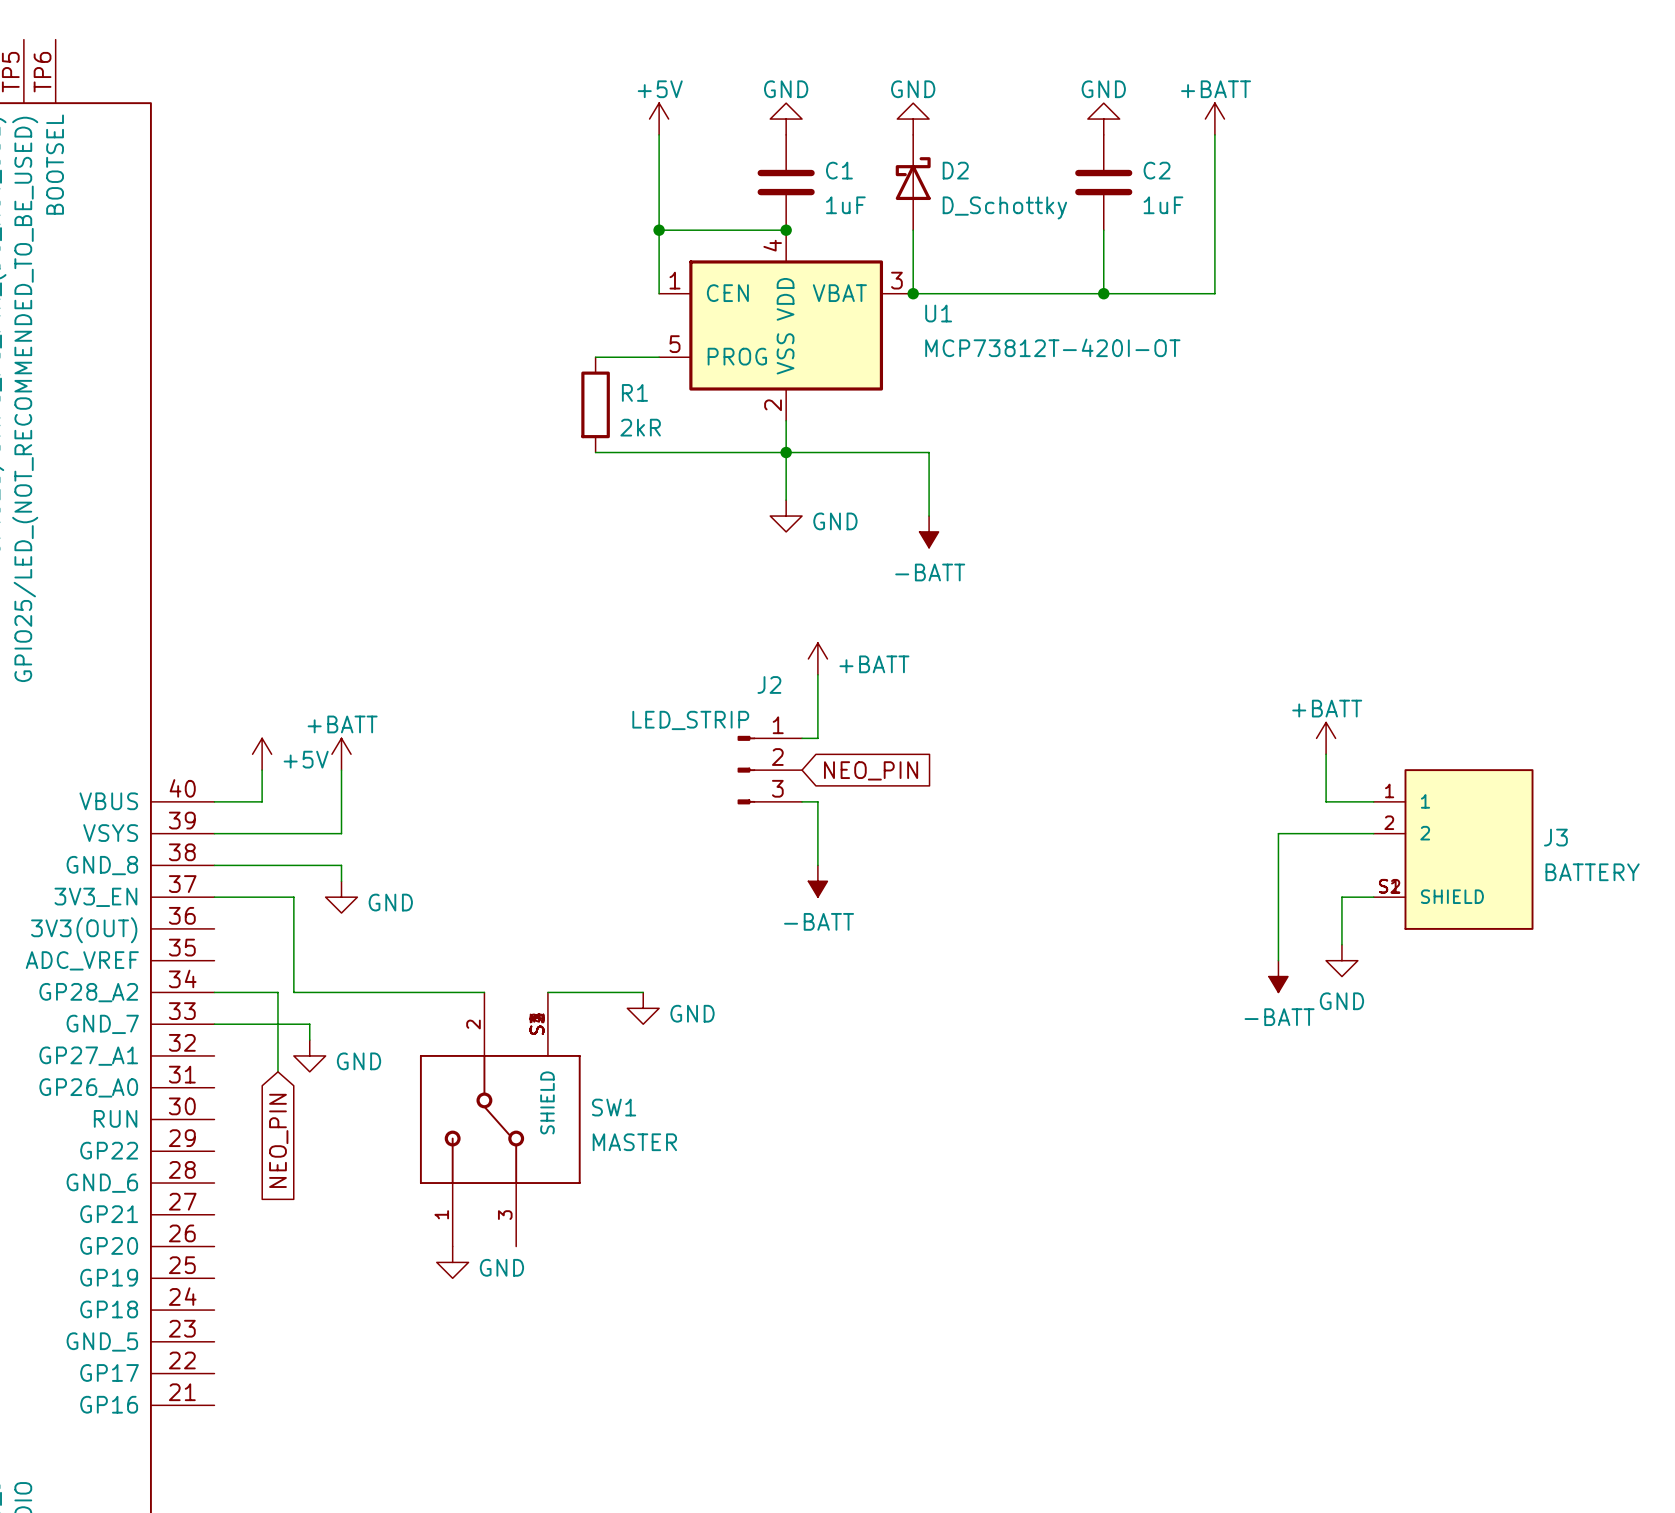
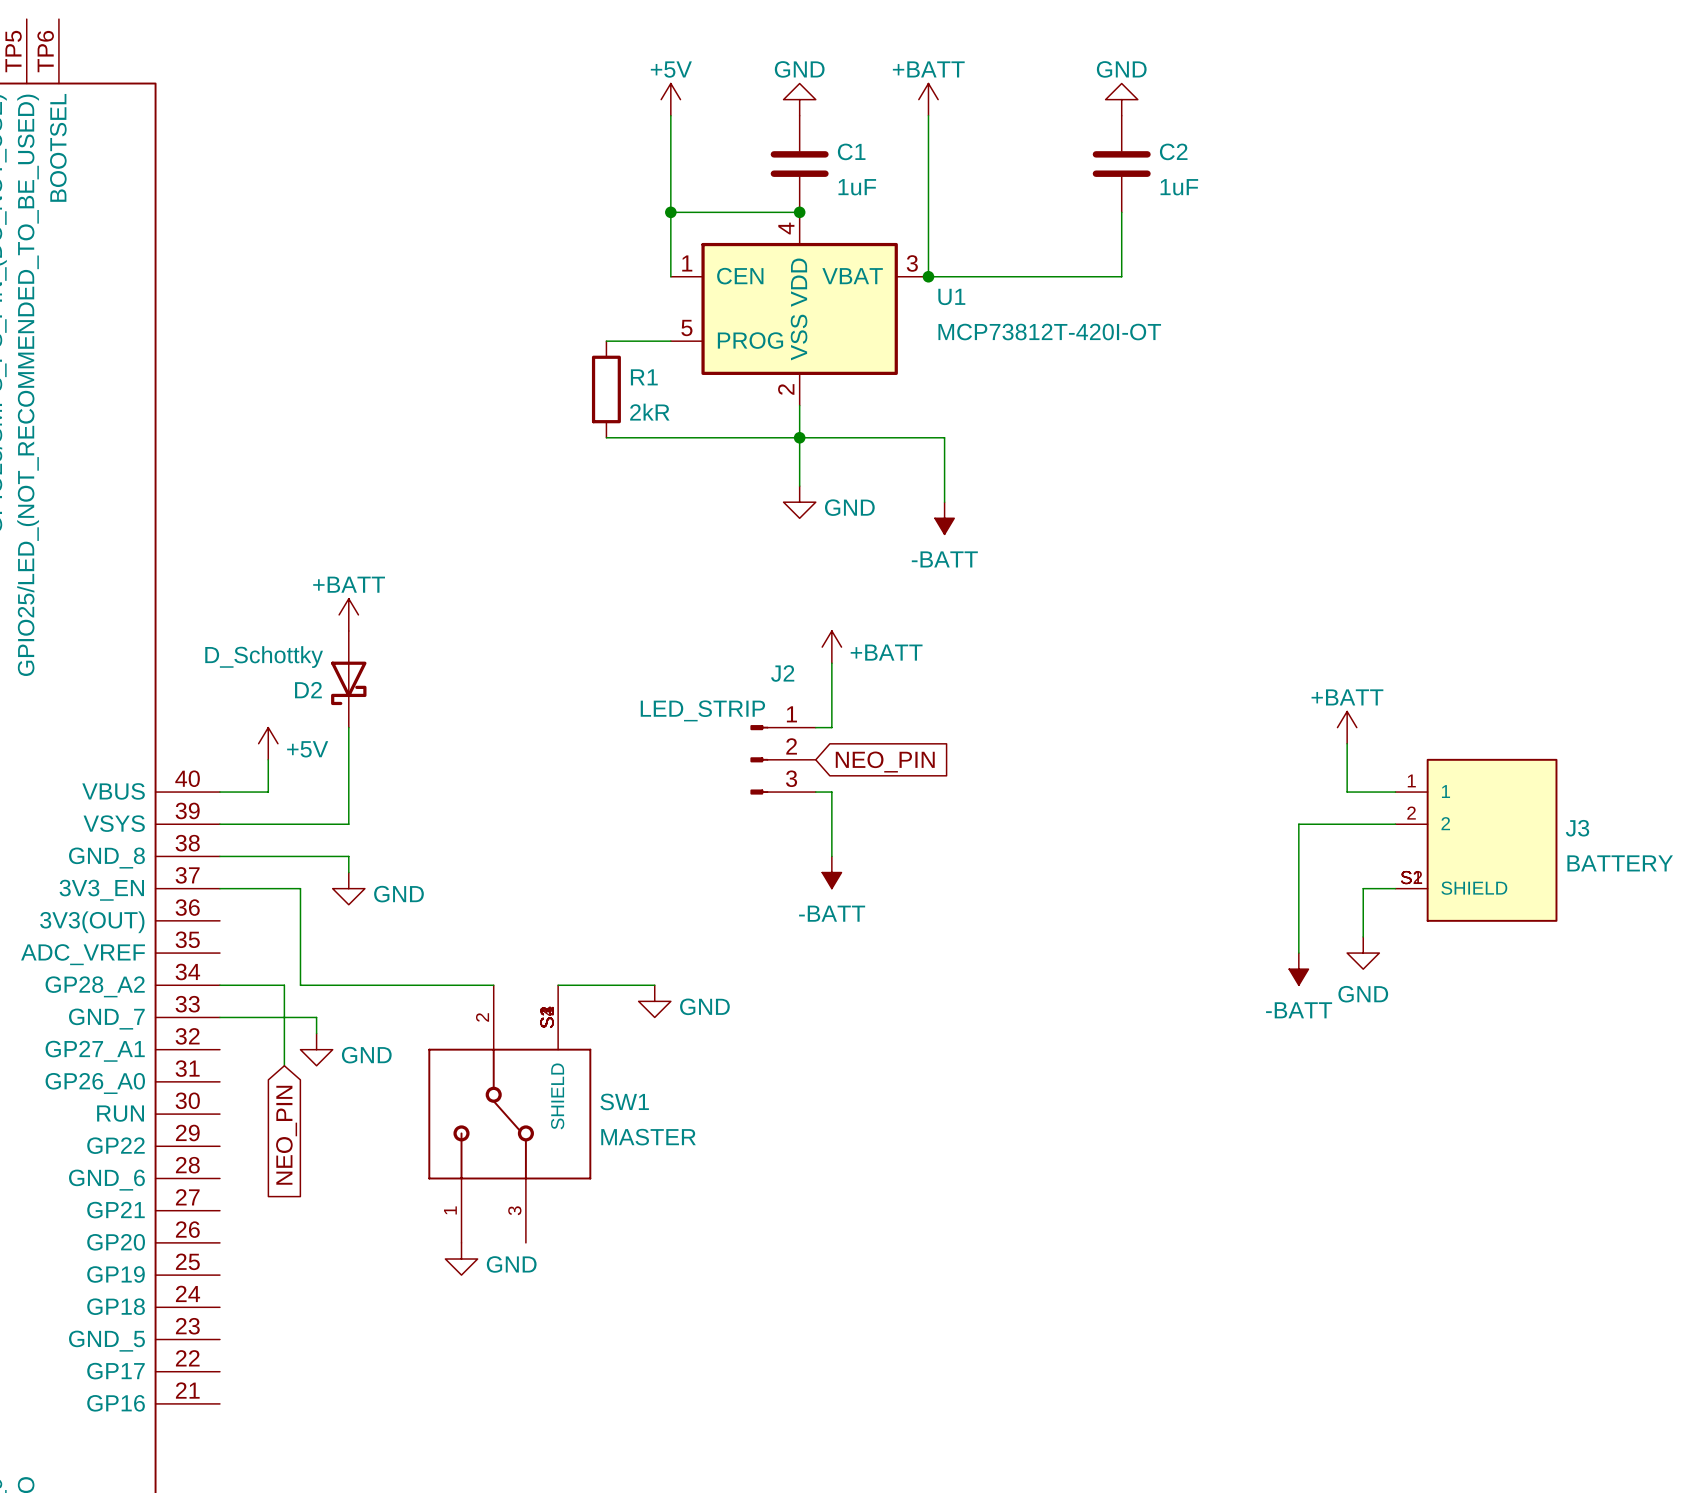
power symbol: GND (913, 119) -> +BATT (928, 99)
power symbol: +BATT (1214, 119) -> none
wire: (1214, 134) (1214, 293) (1103, 293) -> none
D2 rotation: 0° (913, 178) -> 180° (348, 683)
D2 position: (913, 182) -> (348, 679)
junction: (1103, 293) -> none
power symbol position: +BATT (341, 754) -> +BATT (348, 614)

